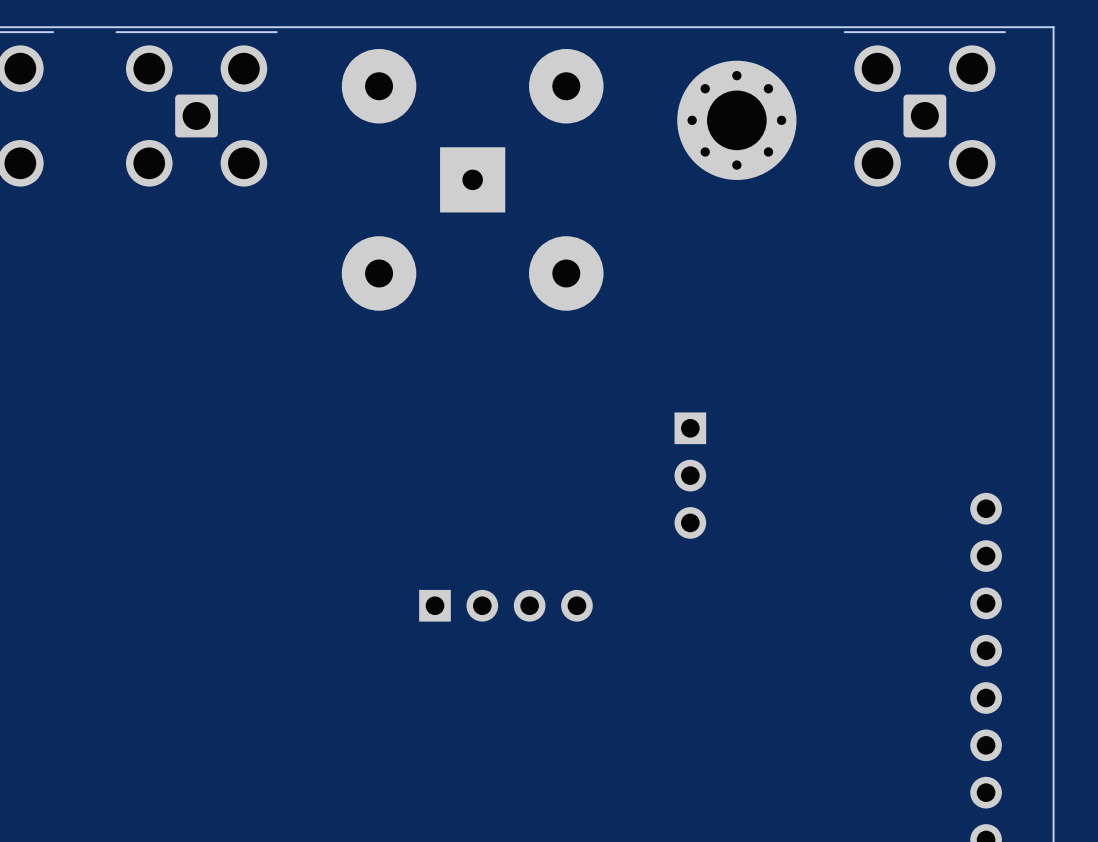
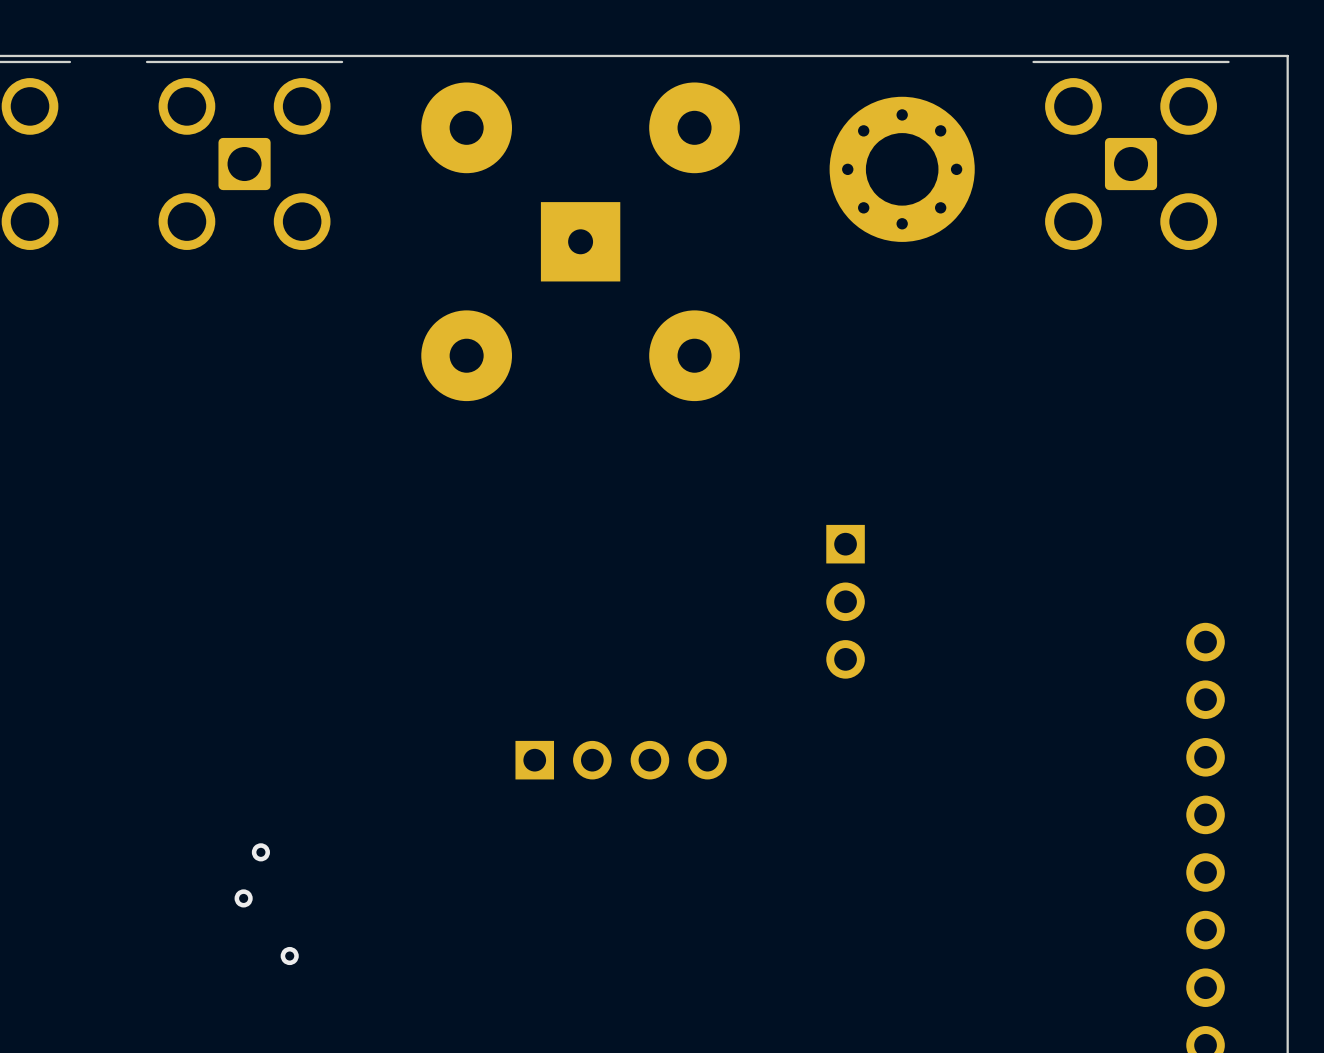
via: none -> (260, 852)
via: none -> (243, 898)
via: none -> (289, 956)

